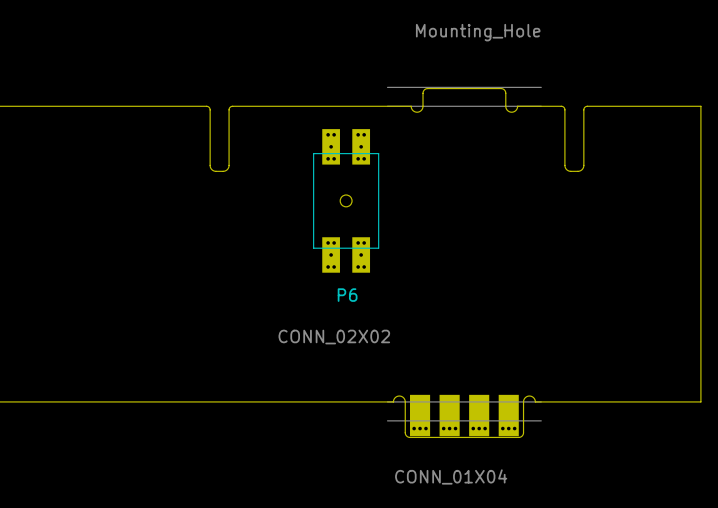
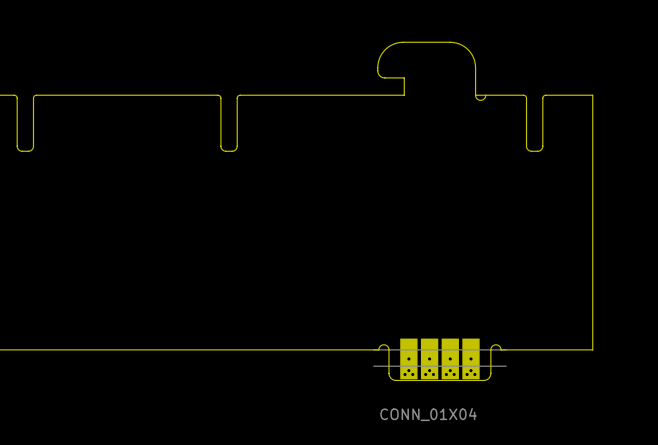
drawing: [387, 87, 542, 107] -> none
board edge: (411, 106) (412, 110) (417, 112) (421, 110) (423, 106) -> (394, 95) (404, 95) (404, 77) (381, 76) (378, 72) (378, 64) (381, 55) (387, 47) (403, 42) (450, 42) (462, 45) (470, 52) (474, 61) (475, 95) (485, 95)
board edge: (641, 106) (700, 106) (700, 401) (641, 401) -> (592, 95) (592, 349)
P6: CONN_02X02 (346, 200) -> none
part footprint: [387, 394, 542, 439] -> [373, 338, 507, 381]

